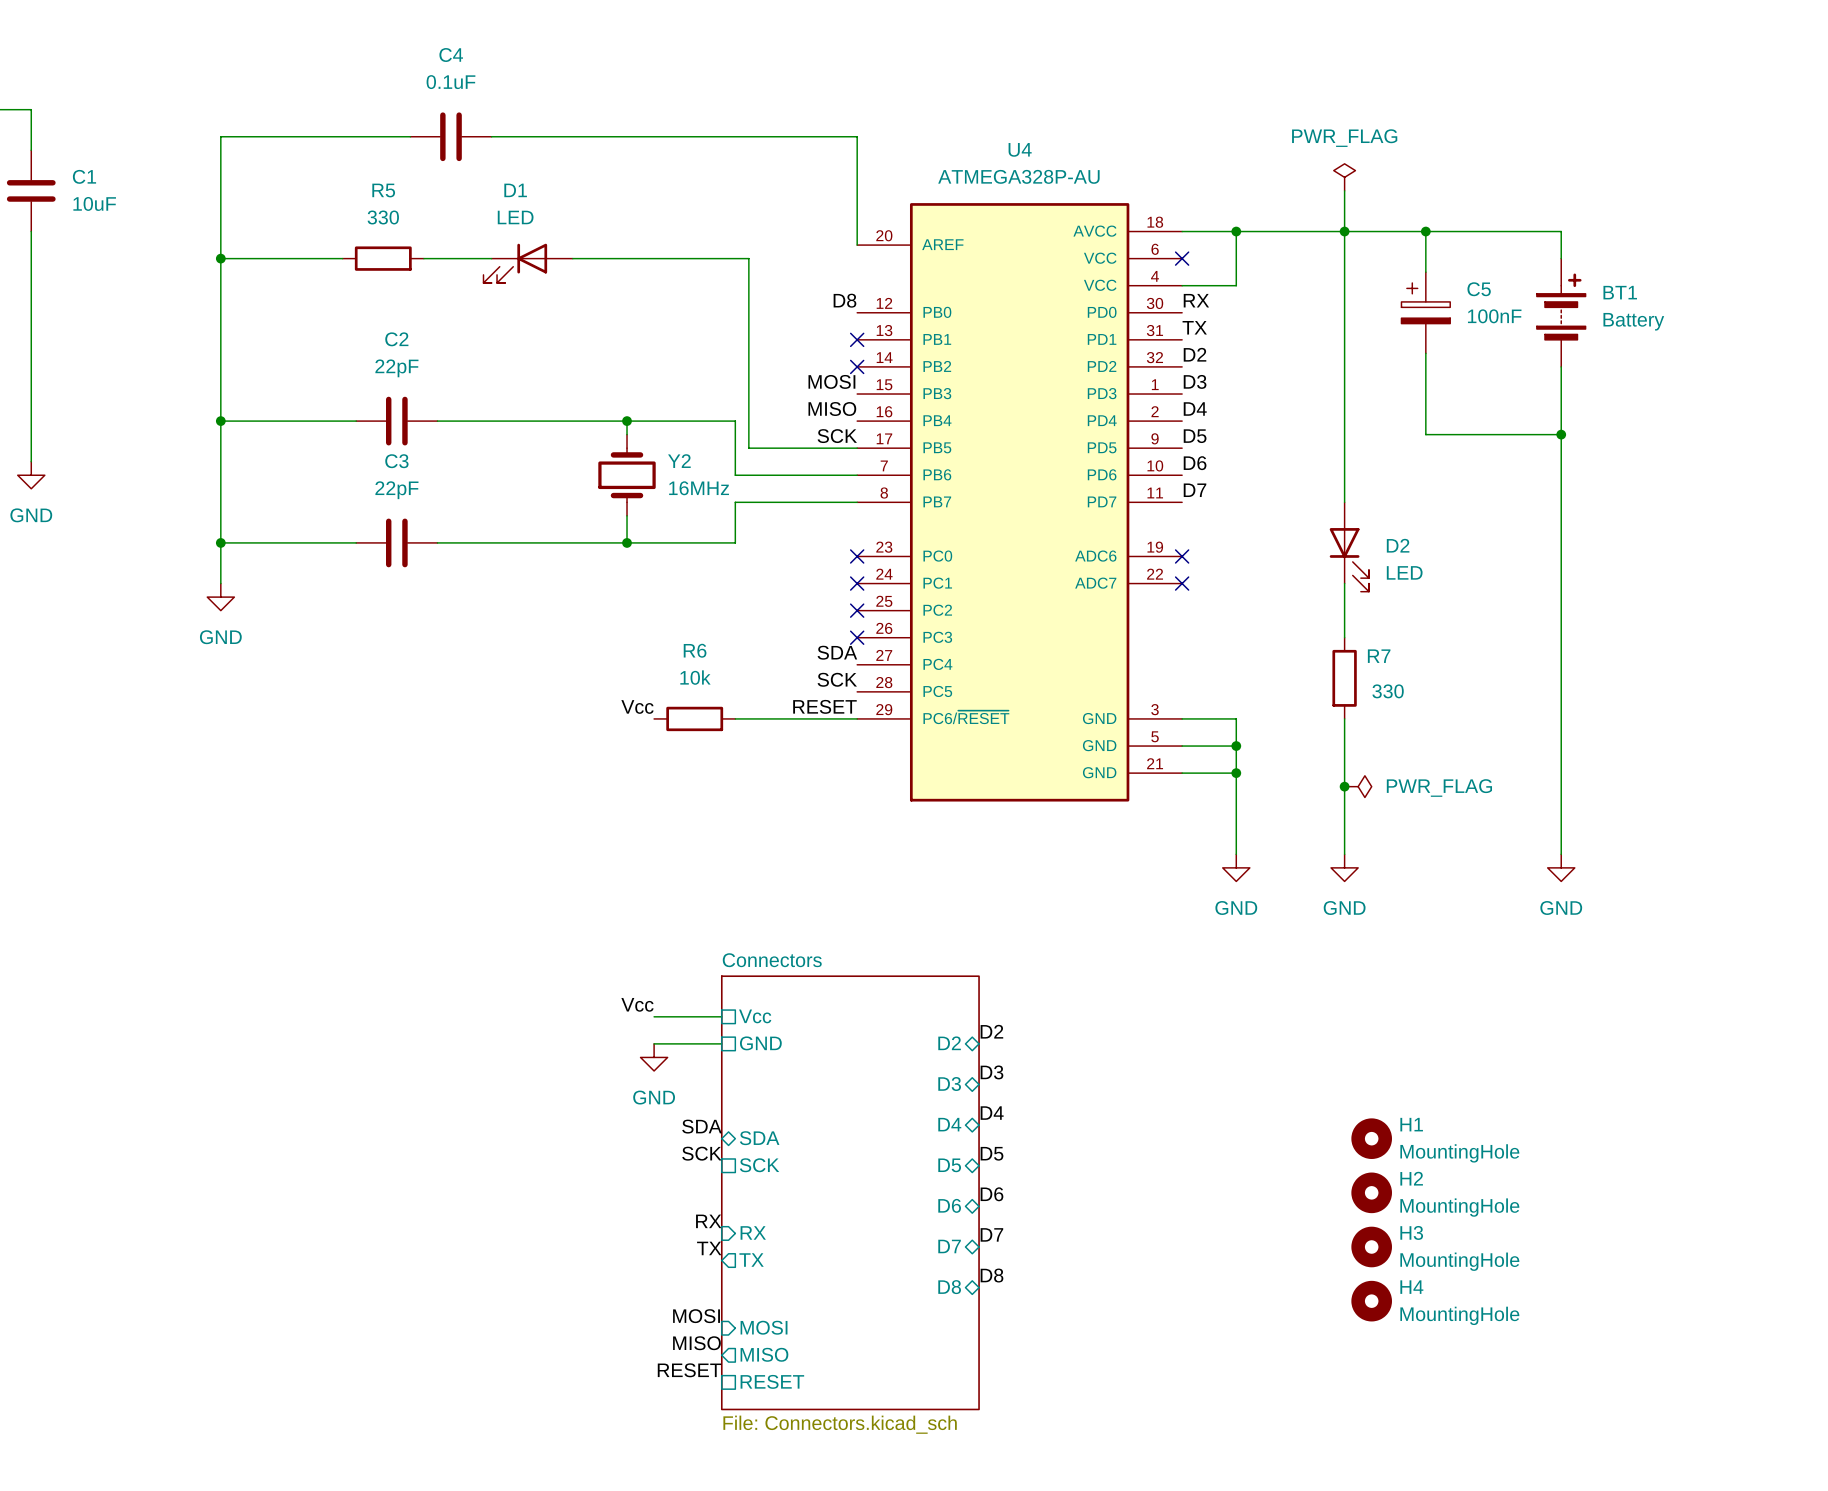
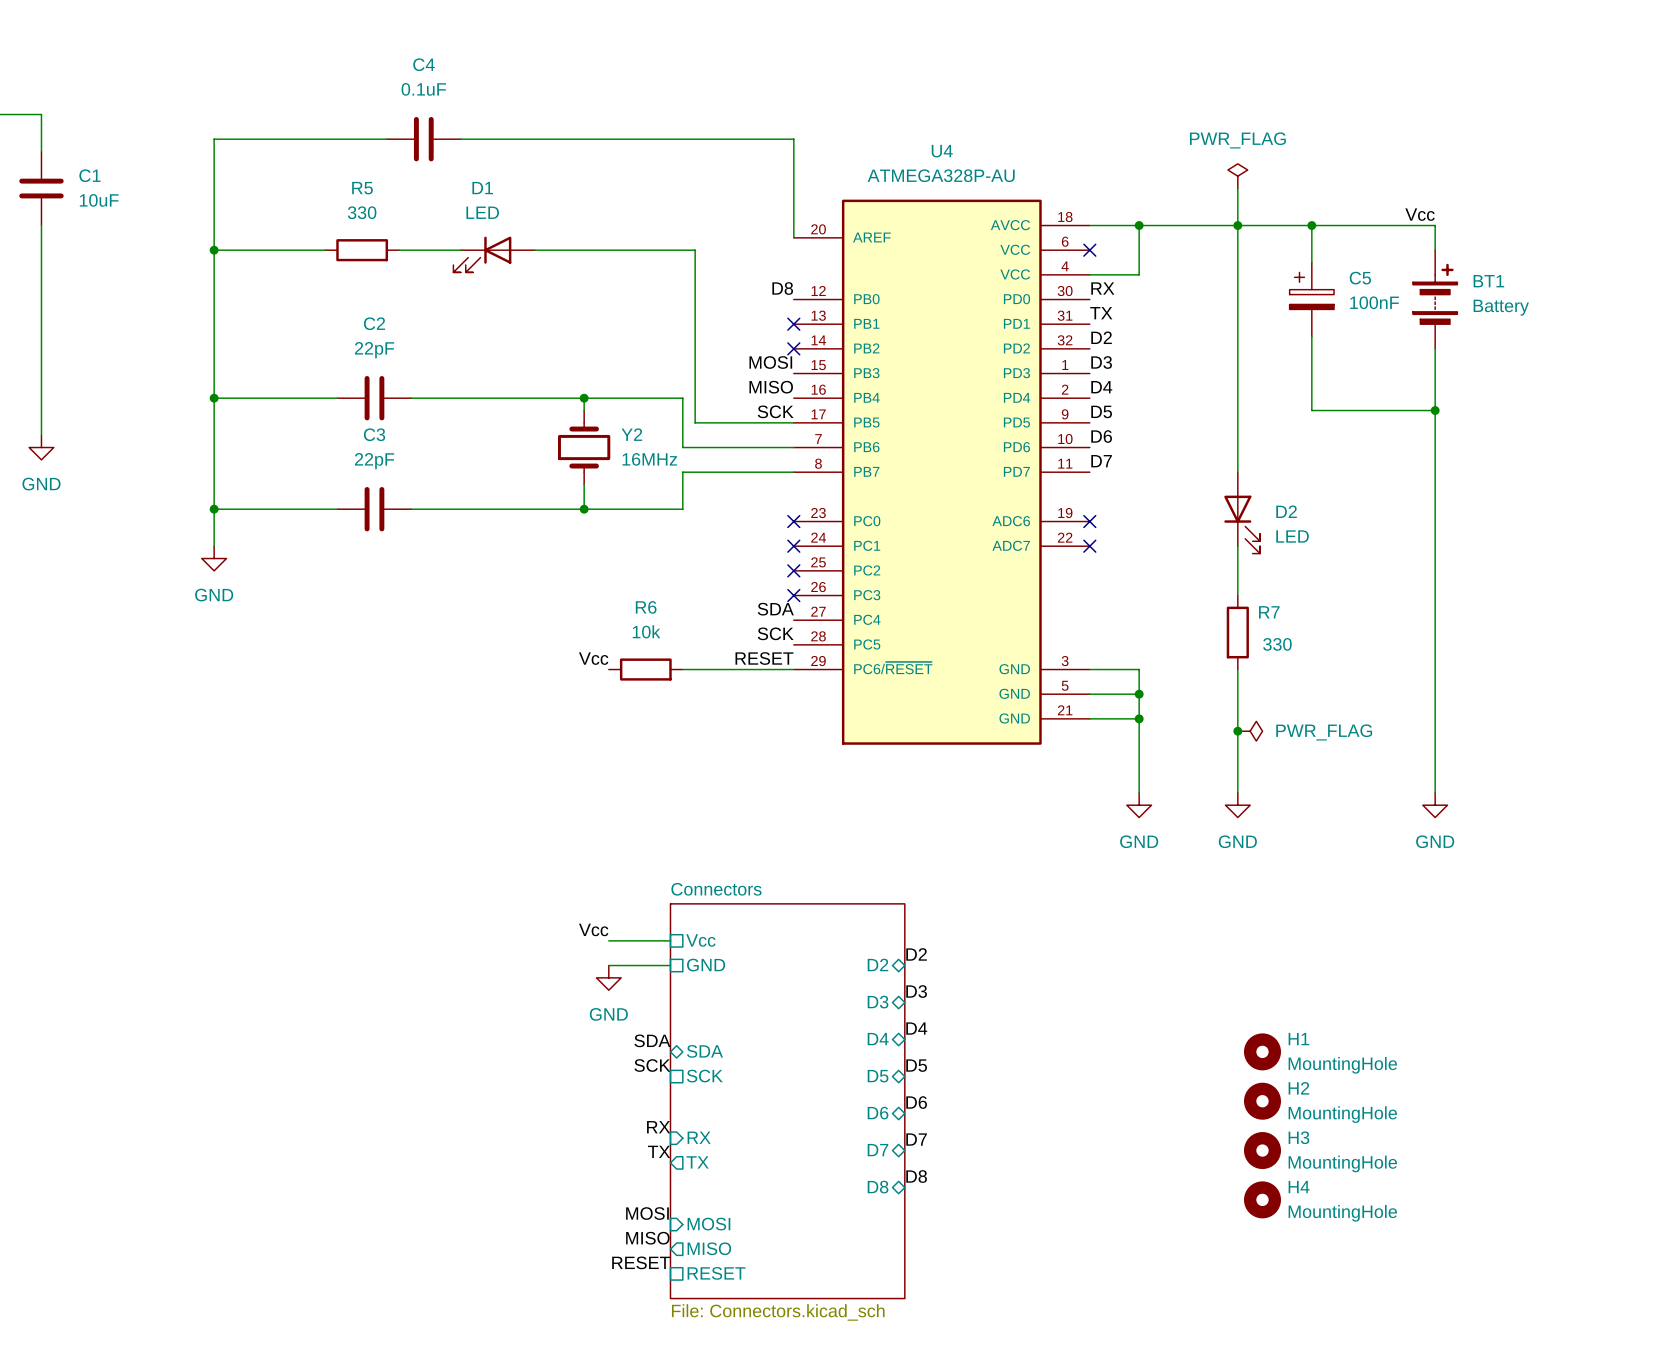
label: none -> Vcc (1420, 214)

